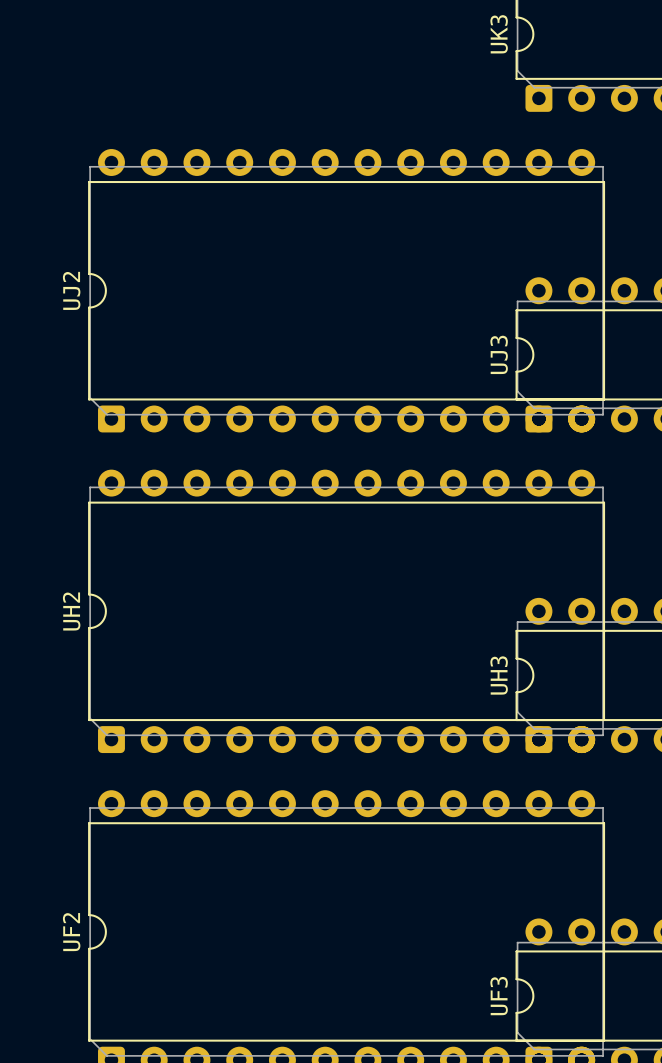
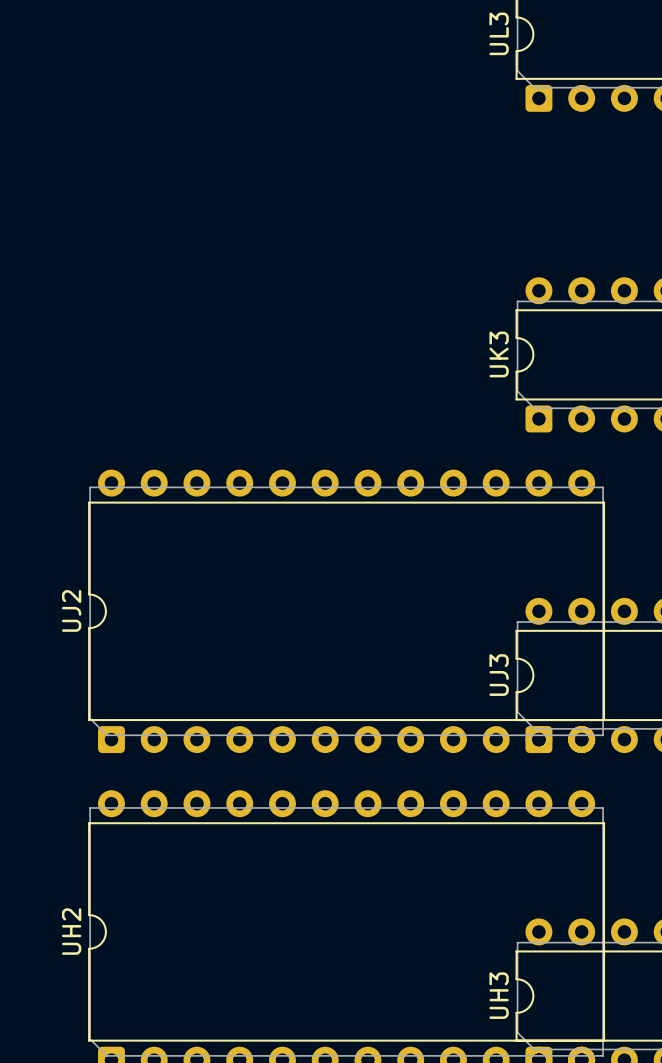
UK3 name: UK3 (499, 34) -> UL3 (499, 33)
UJ2: (346, 290) -> none
UJ3 name: UJ3 (499, 354) -> UK3 (499, 354)
UH2 name: UH2 (71, 611) -> UJ2 (71, 610)
UH3 name: UH3 (499, 675) -> UJ3 (499, 675)
UF2 name: UF2 (71, 932) -> UH2 (71, 931)
UF3 name: UF3 (499, 996) -> UH3 (499, 995)

